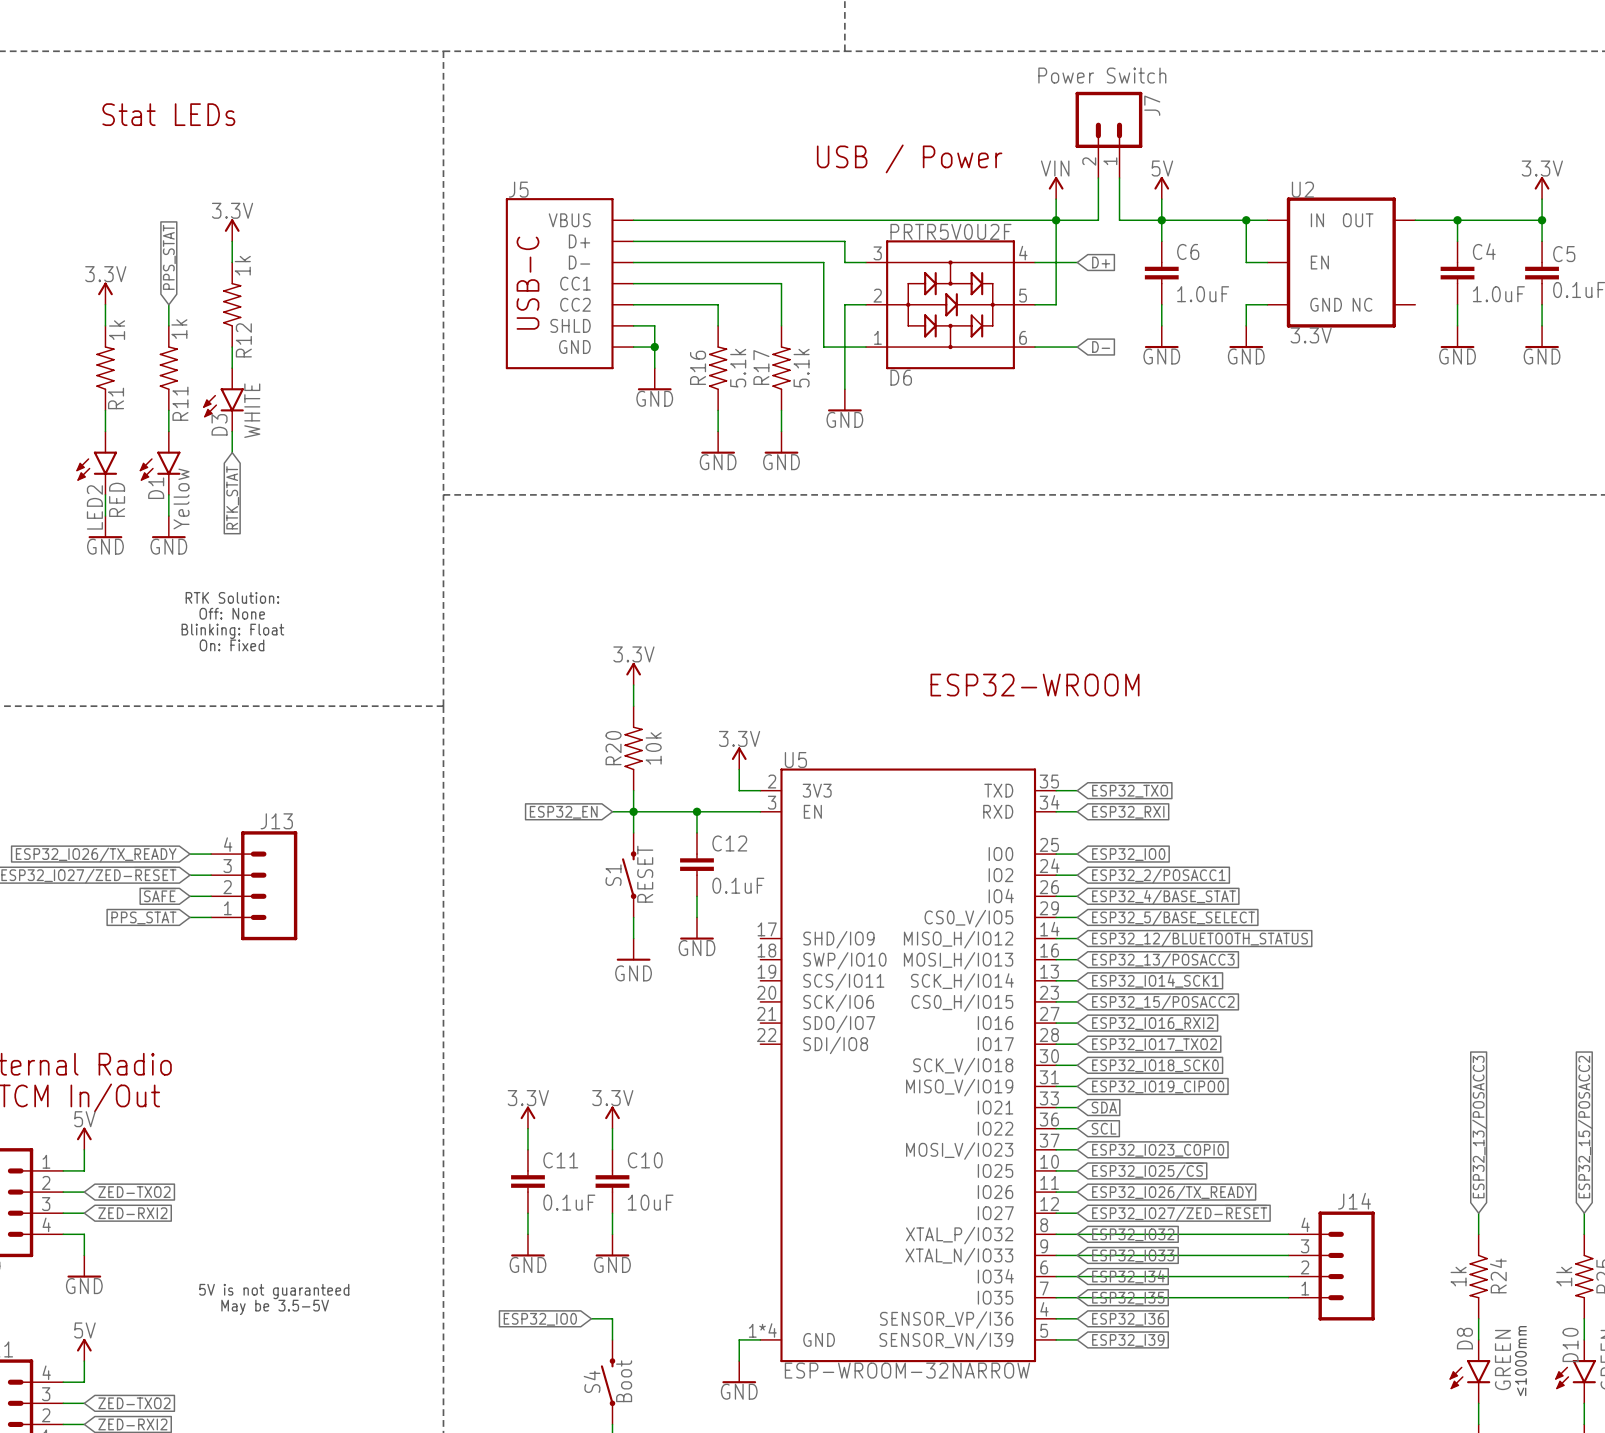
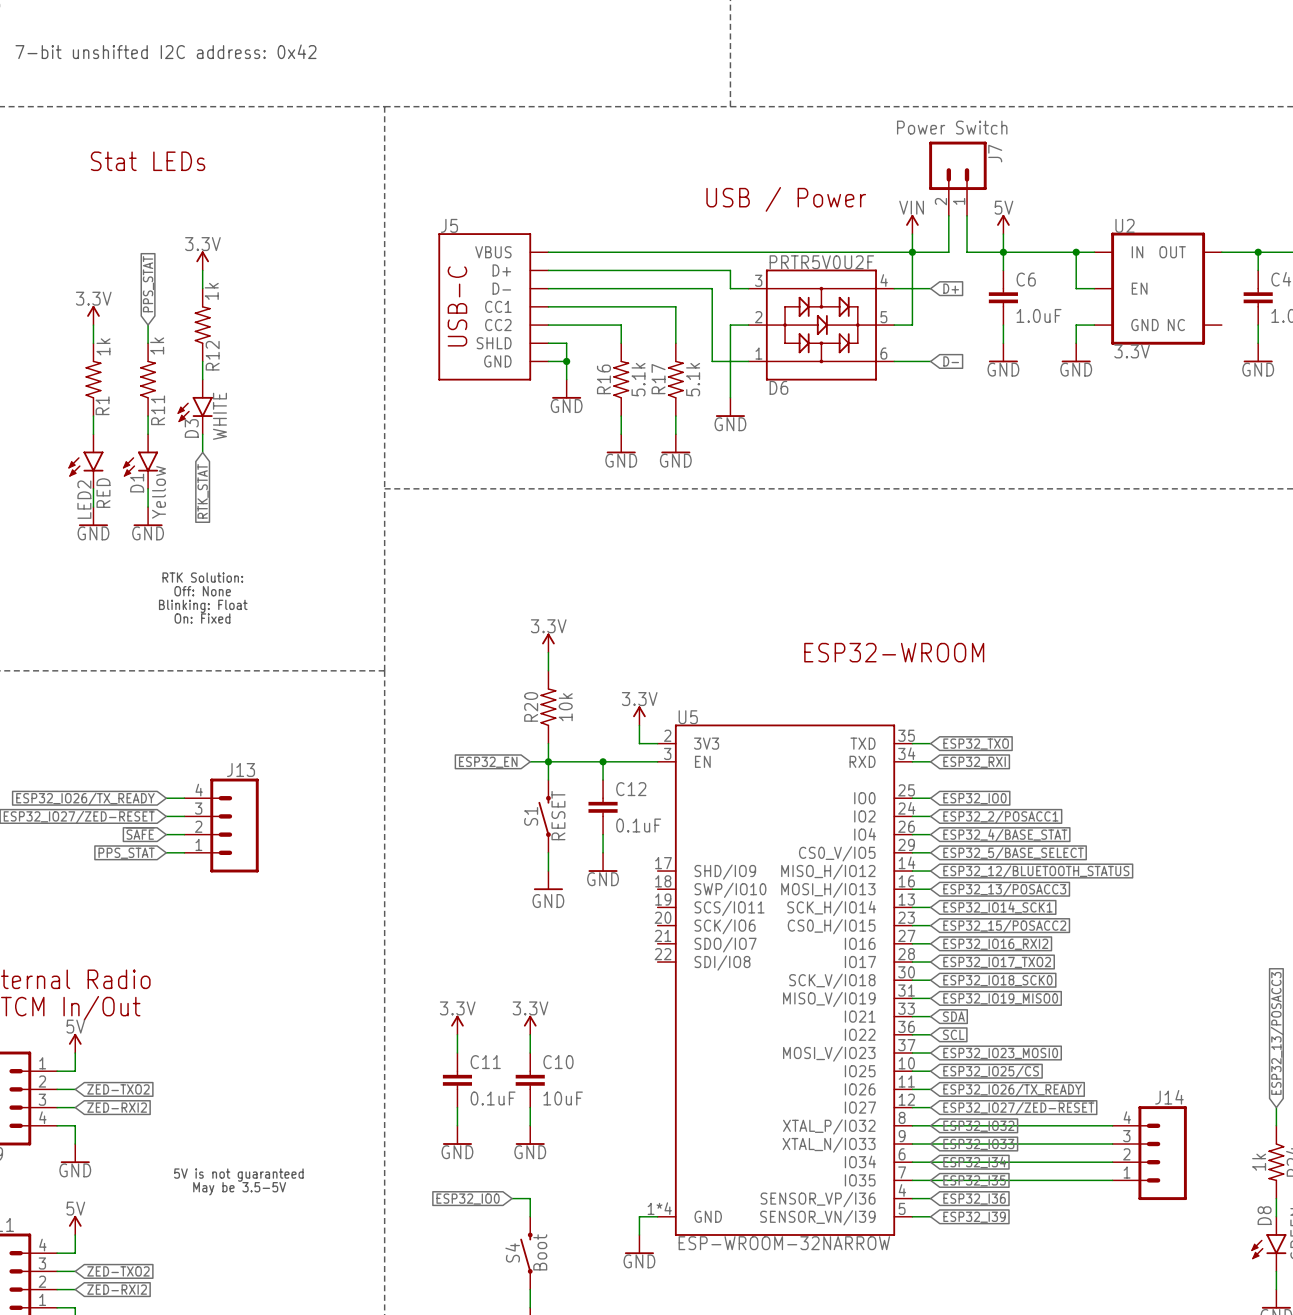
global label: ESP32_IO19_CIPO0 (1158, 1086) -> ESP32_IO19_MISO0 (1000, 998)
global label: ESP32_IO23_COPI0 (1158, 1150) -> ESP32_IO23_MOSI0 (1000, 1053)

